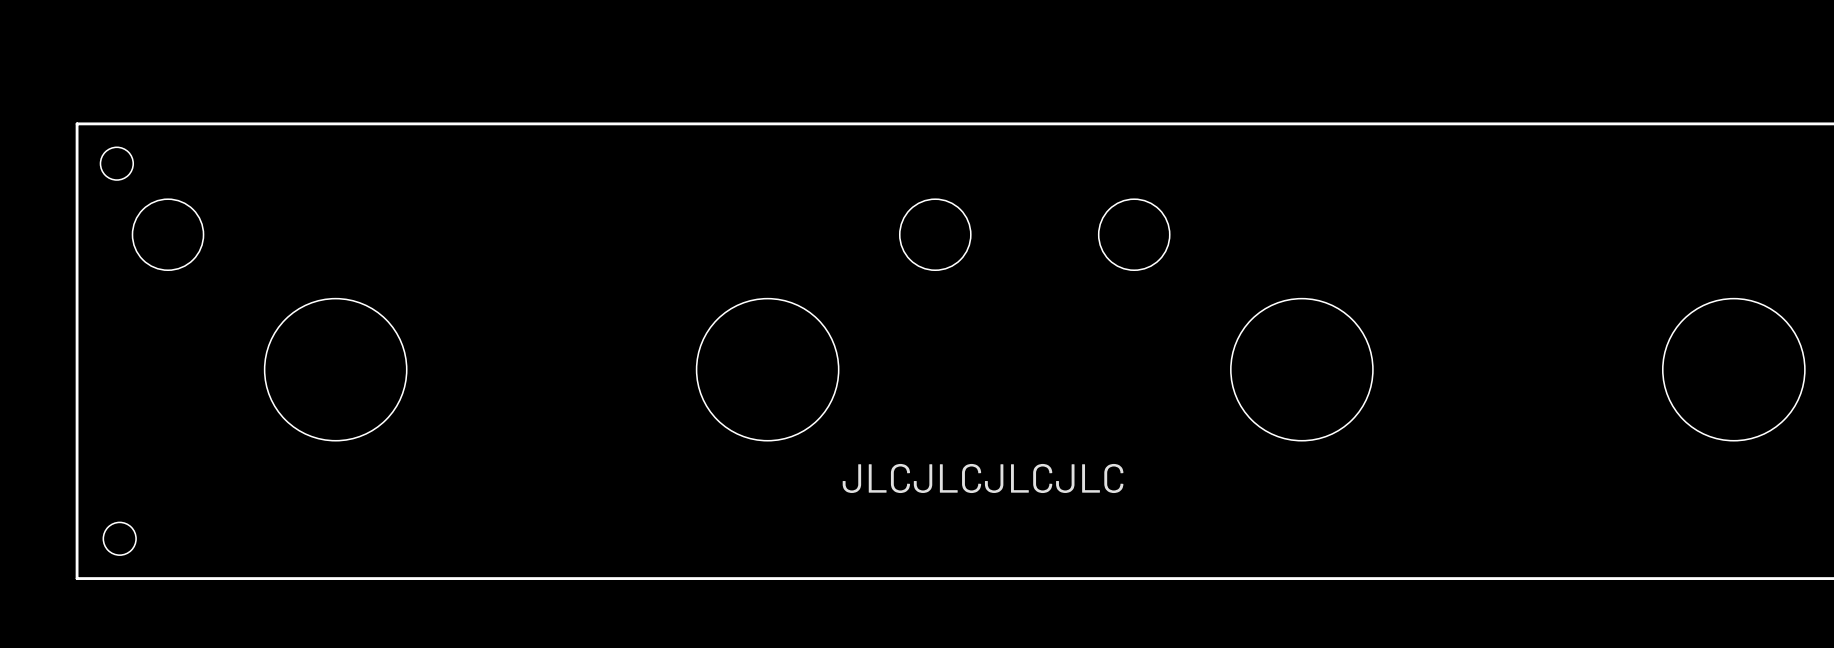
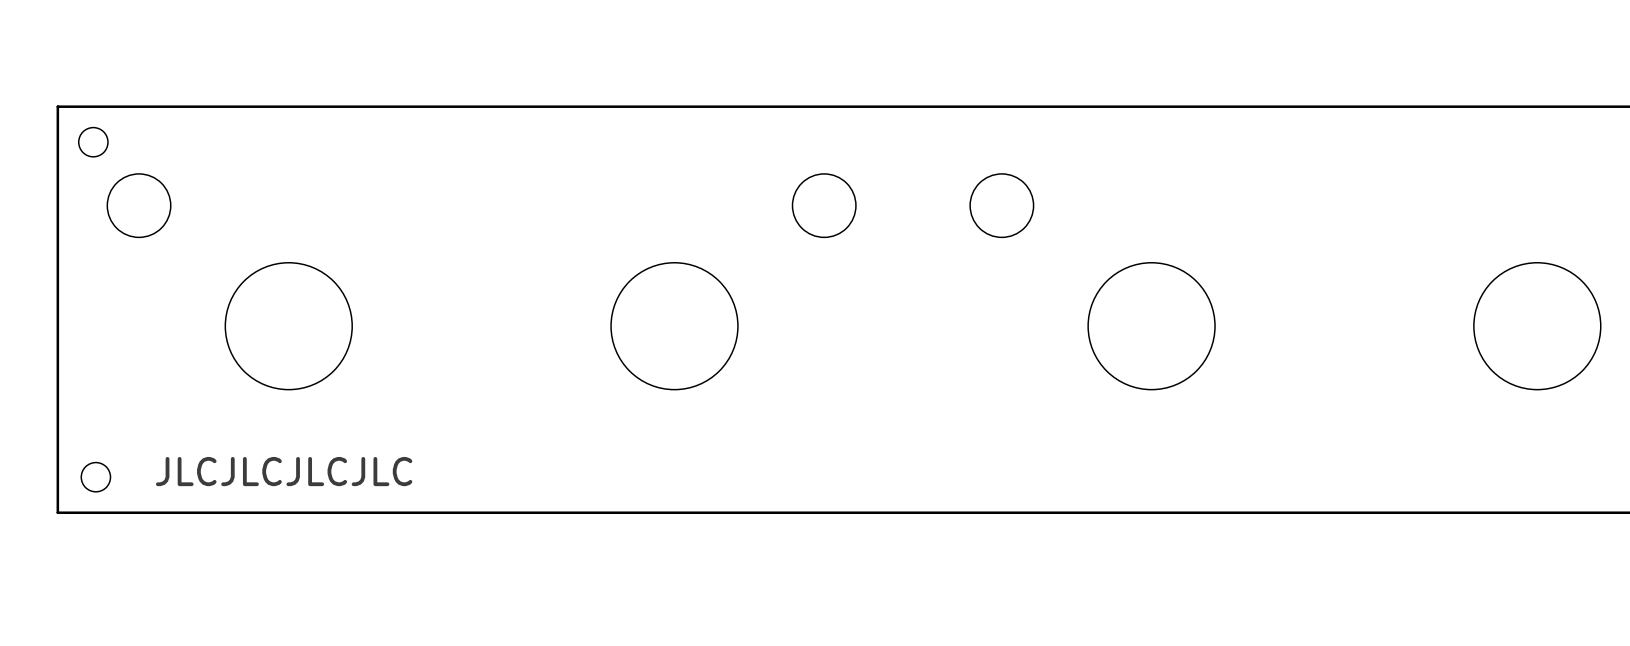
text position: JLCJLCJLCJLC (983, 478) -> JLCJLCJLCJLC (284, 471)

